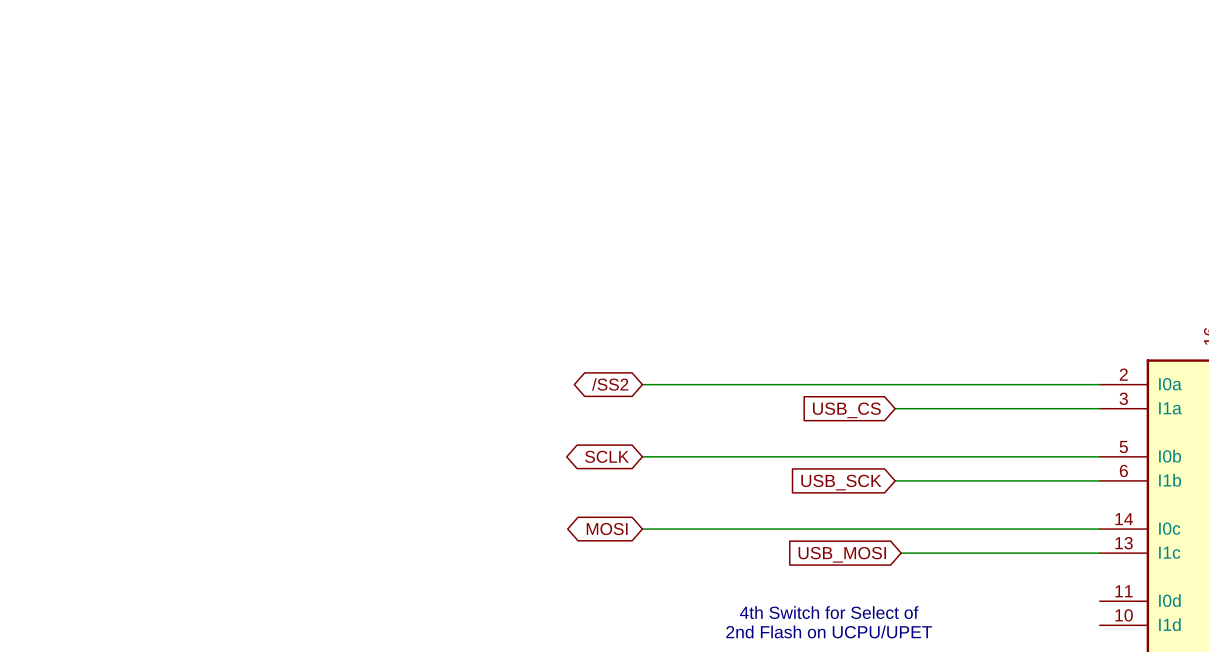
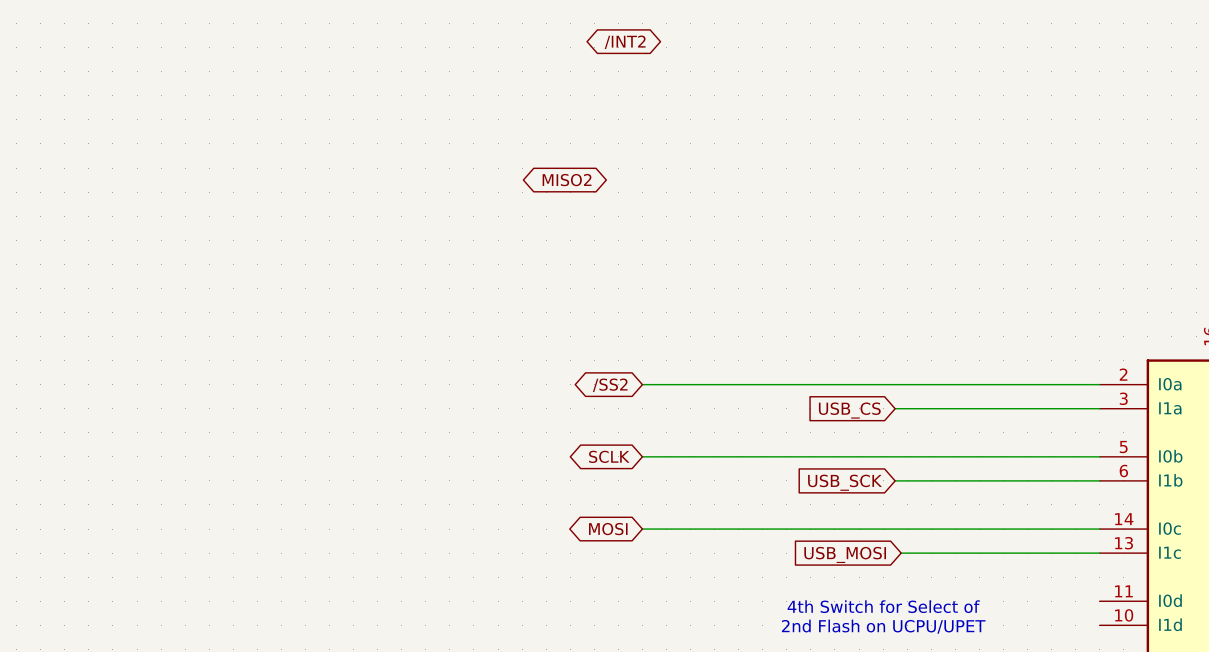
global label: none -> /INT2 (625, 42)
global label: none -> MISO2 (567, 180)
text position: 4th Switch for Select of (829, 612) -> 4th Switch for Select of (883, 606)
text position: 2nd Flash on UCPU/UPET (829, 631) -> 2nd Flash on UCPU/UPET (883, 626)

